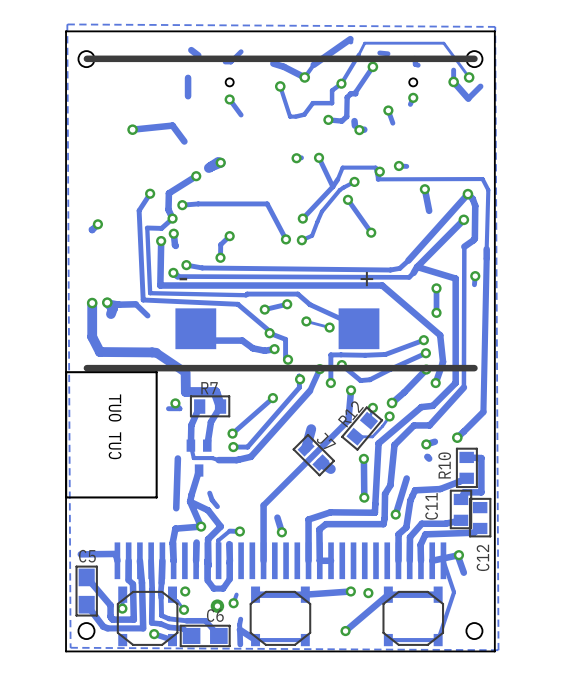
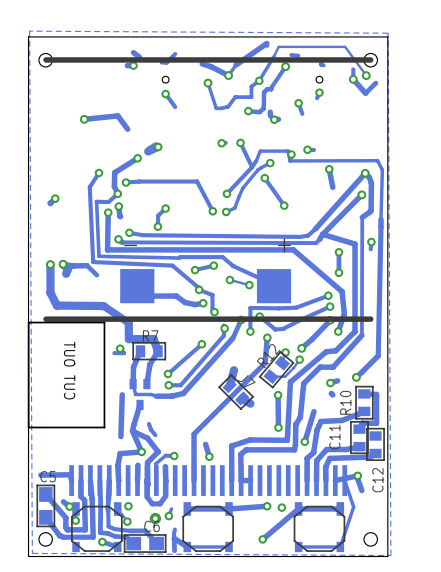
track: none -> (133, 65) (127, 65)
via: none -> (133, 65)
track: (188, 77) (188, 96) -> none
track: none -> (63, 501) (69, 506)
via: none -> (69, 506)

